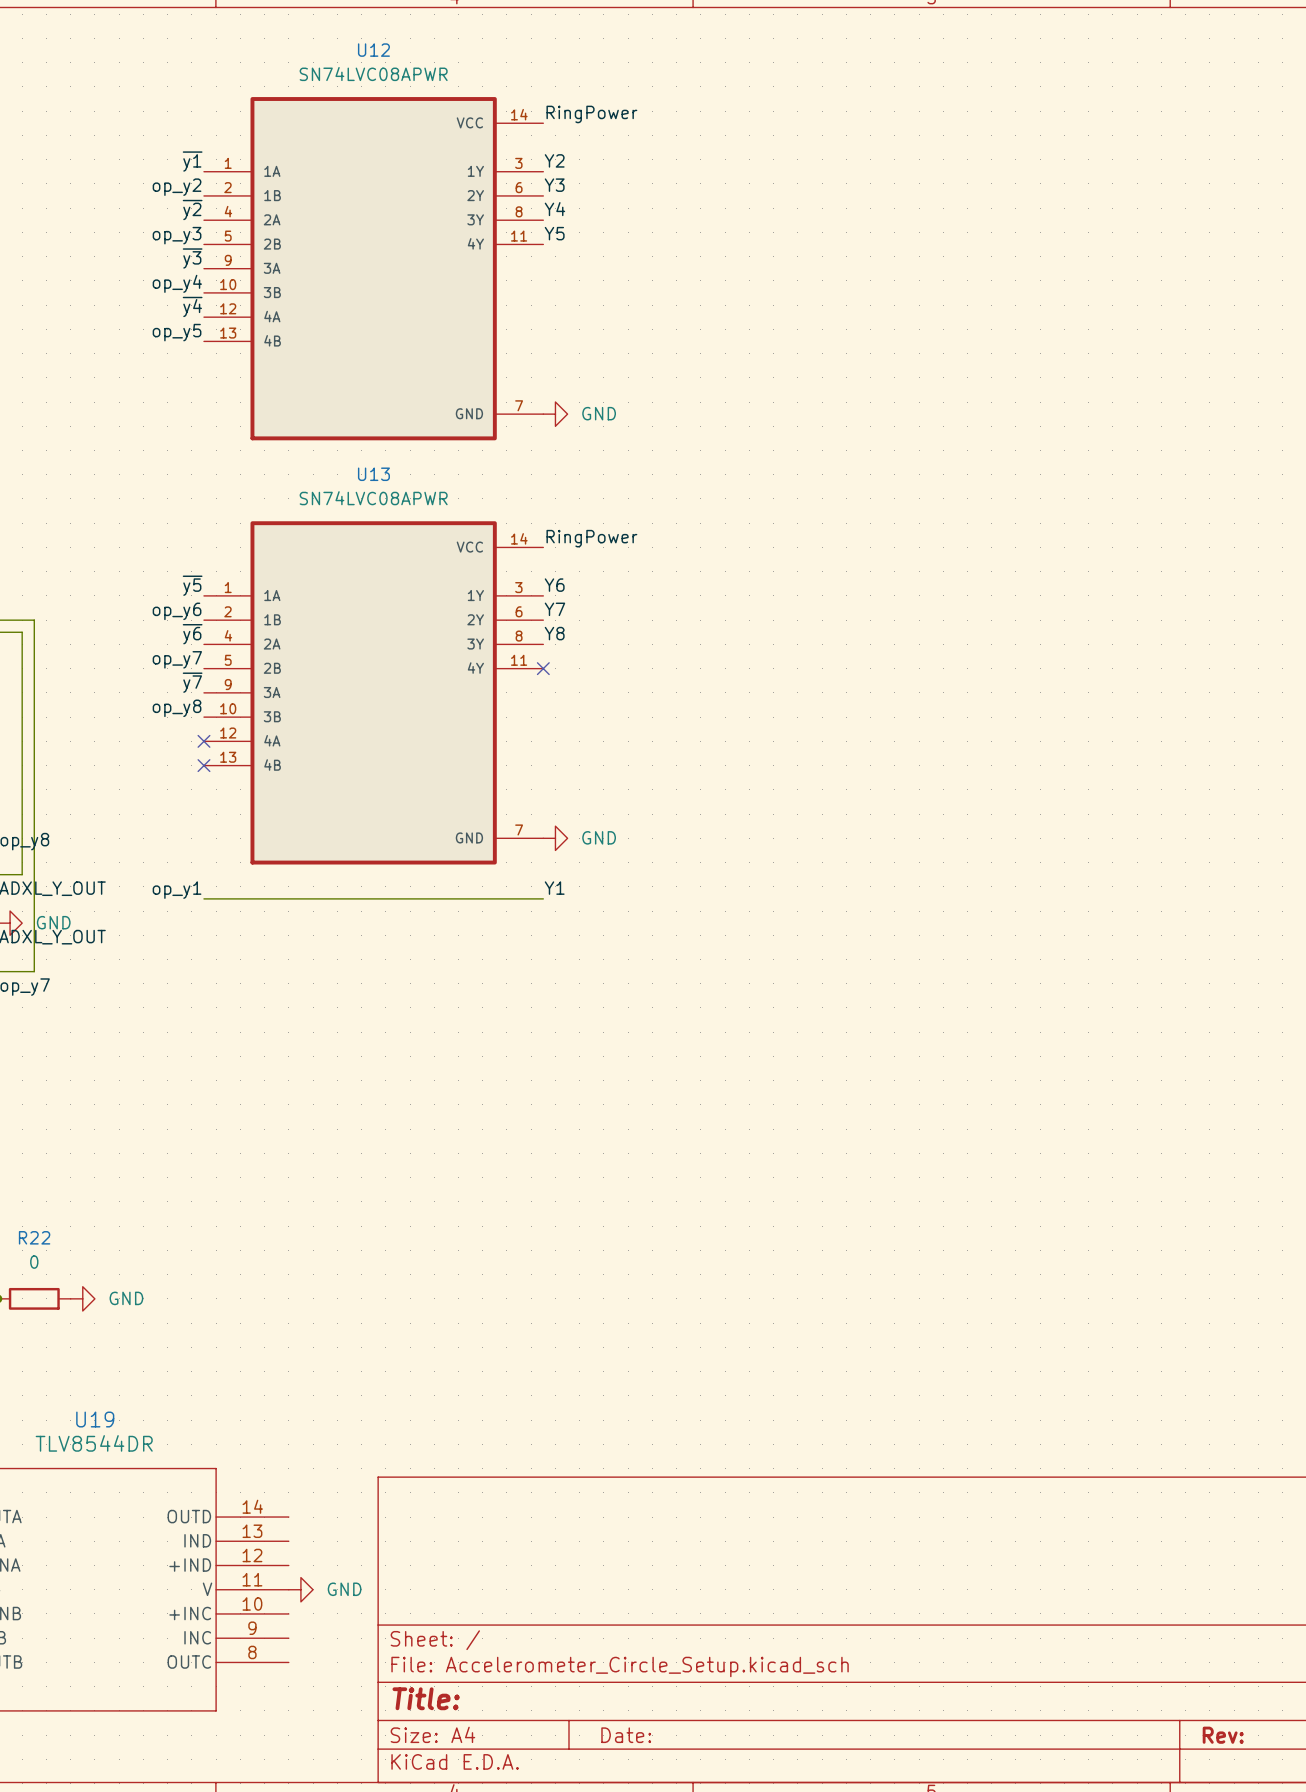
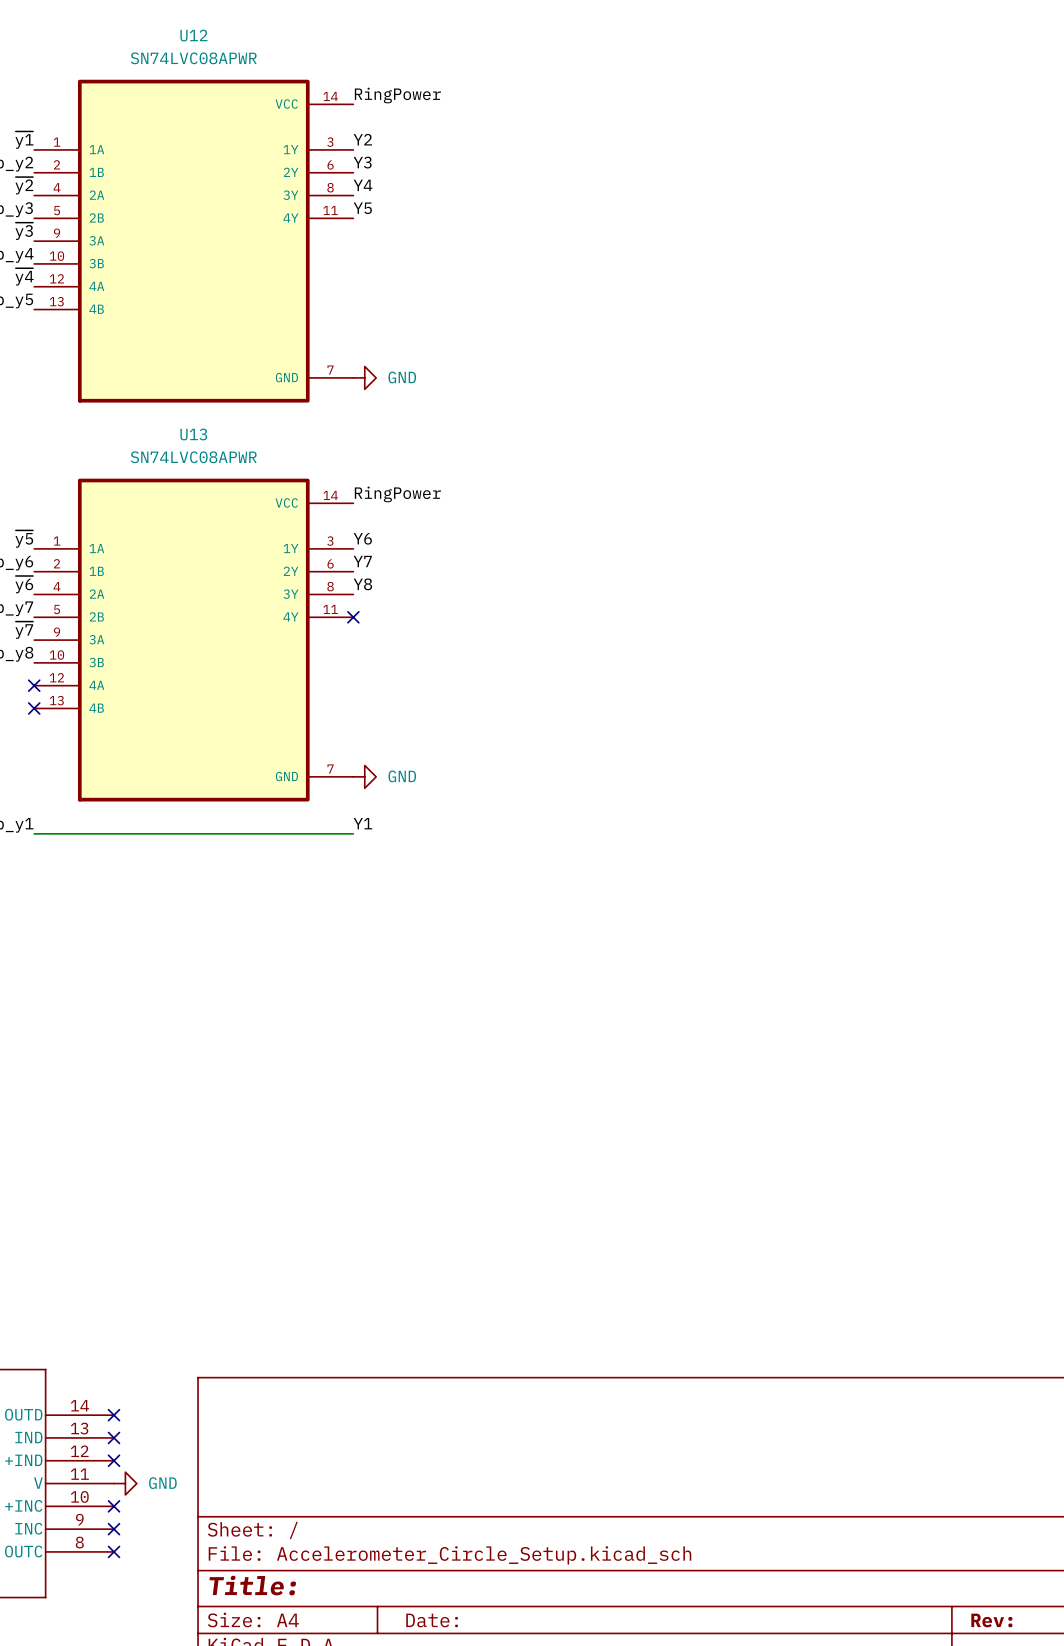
no-connect mark: none -> (114, 1415)
no-connect mark: none -> (114, 1437)
no-connect mark: none -> (114, 1460)
no-connect mark: none -> (114, 1506)
no-connect mark: none -> (114, 1529)
no-connect mark: none -> (114, 1551)

